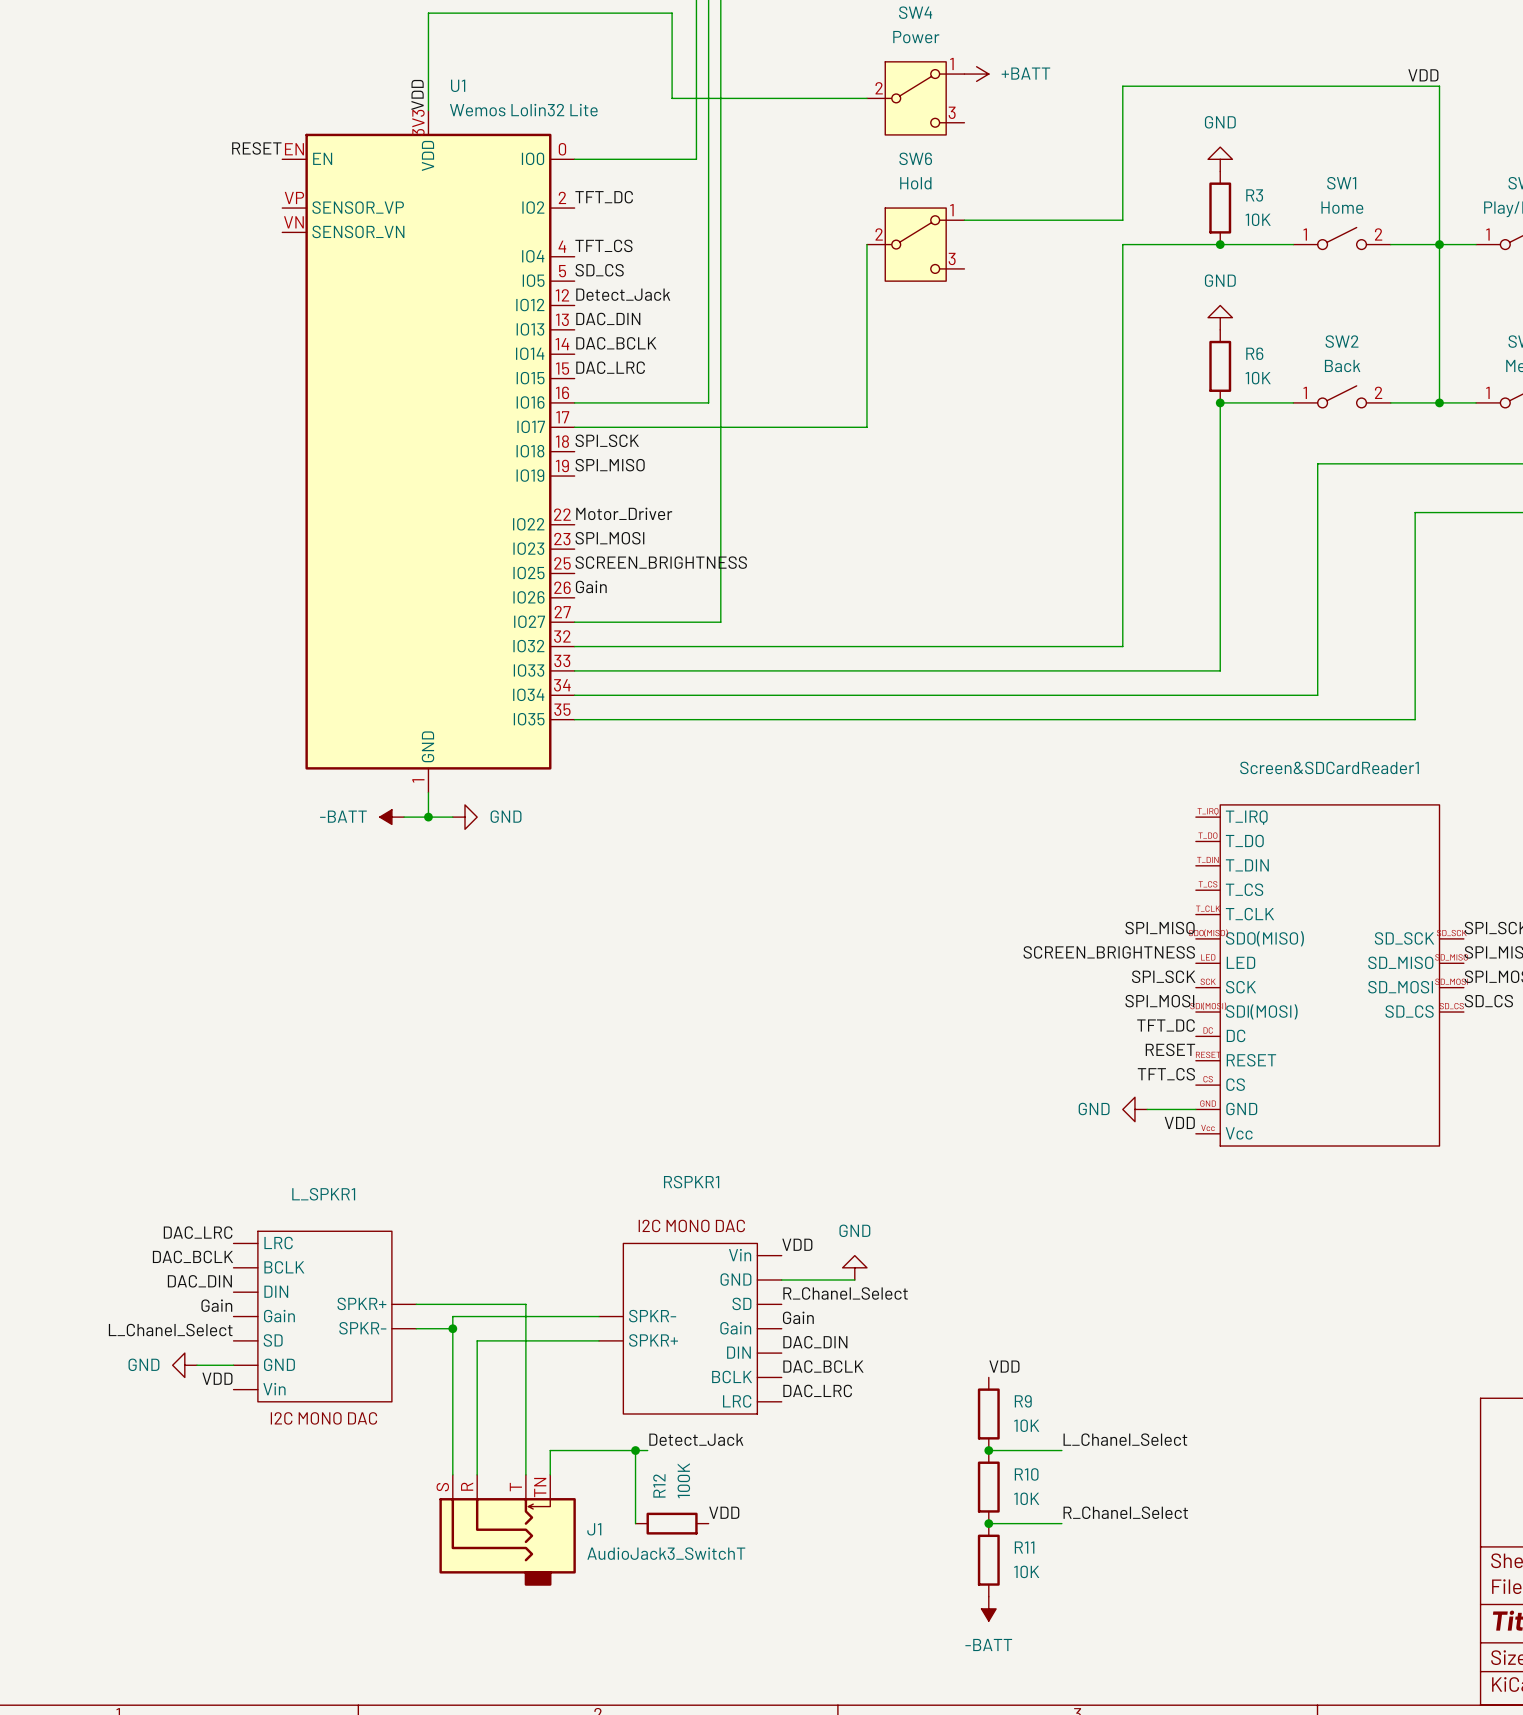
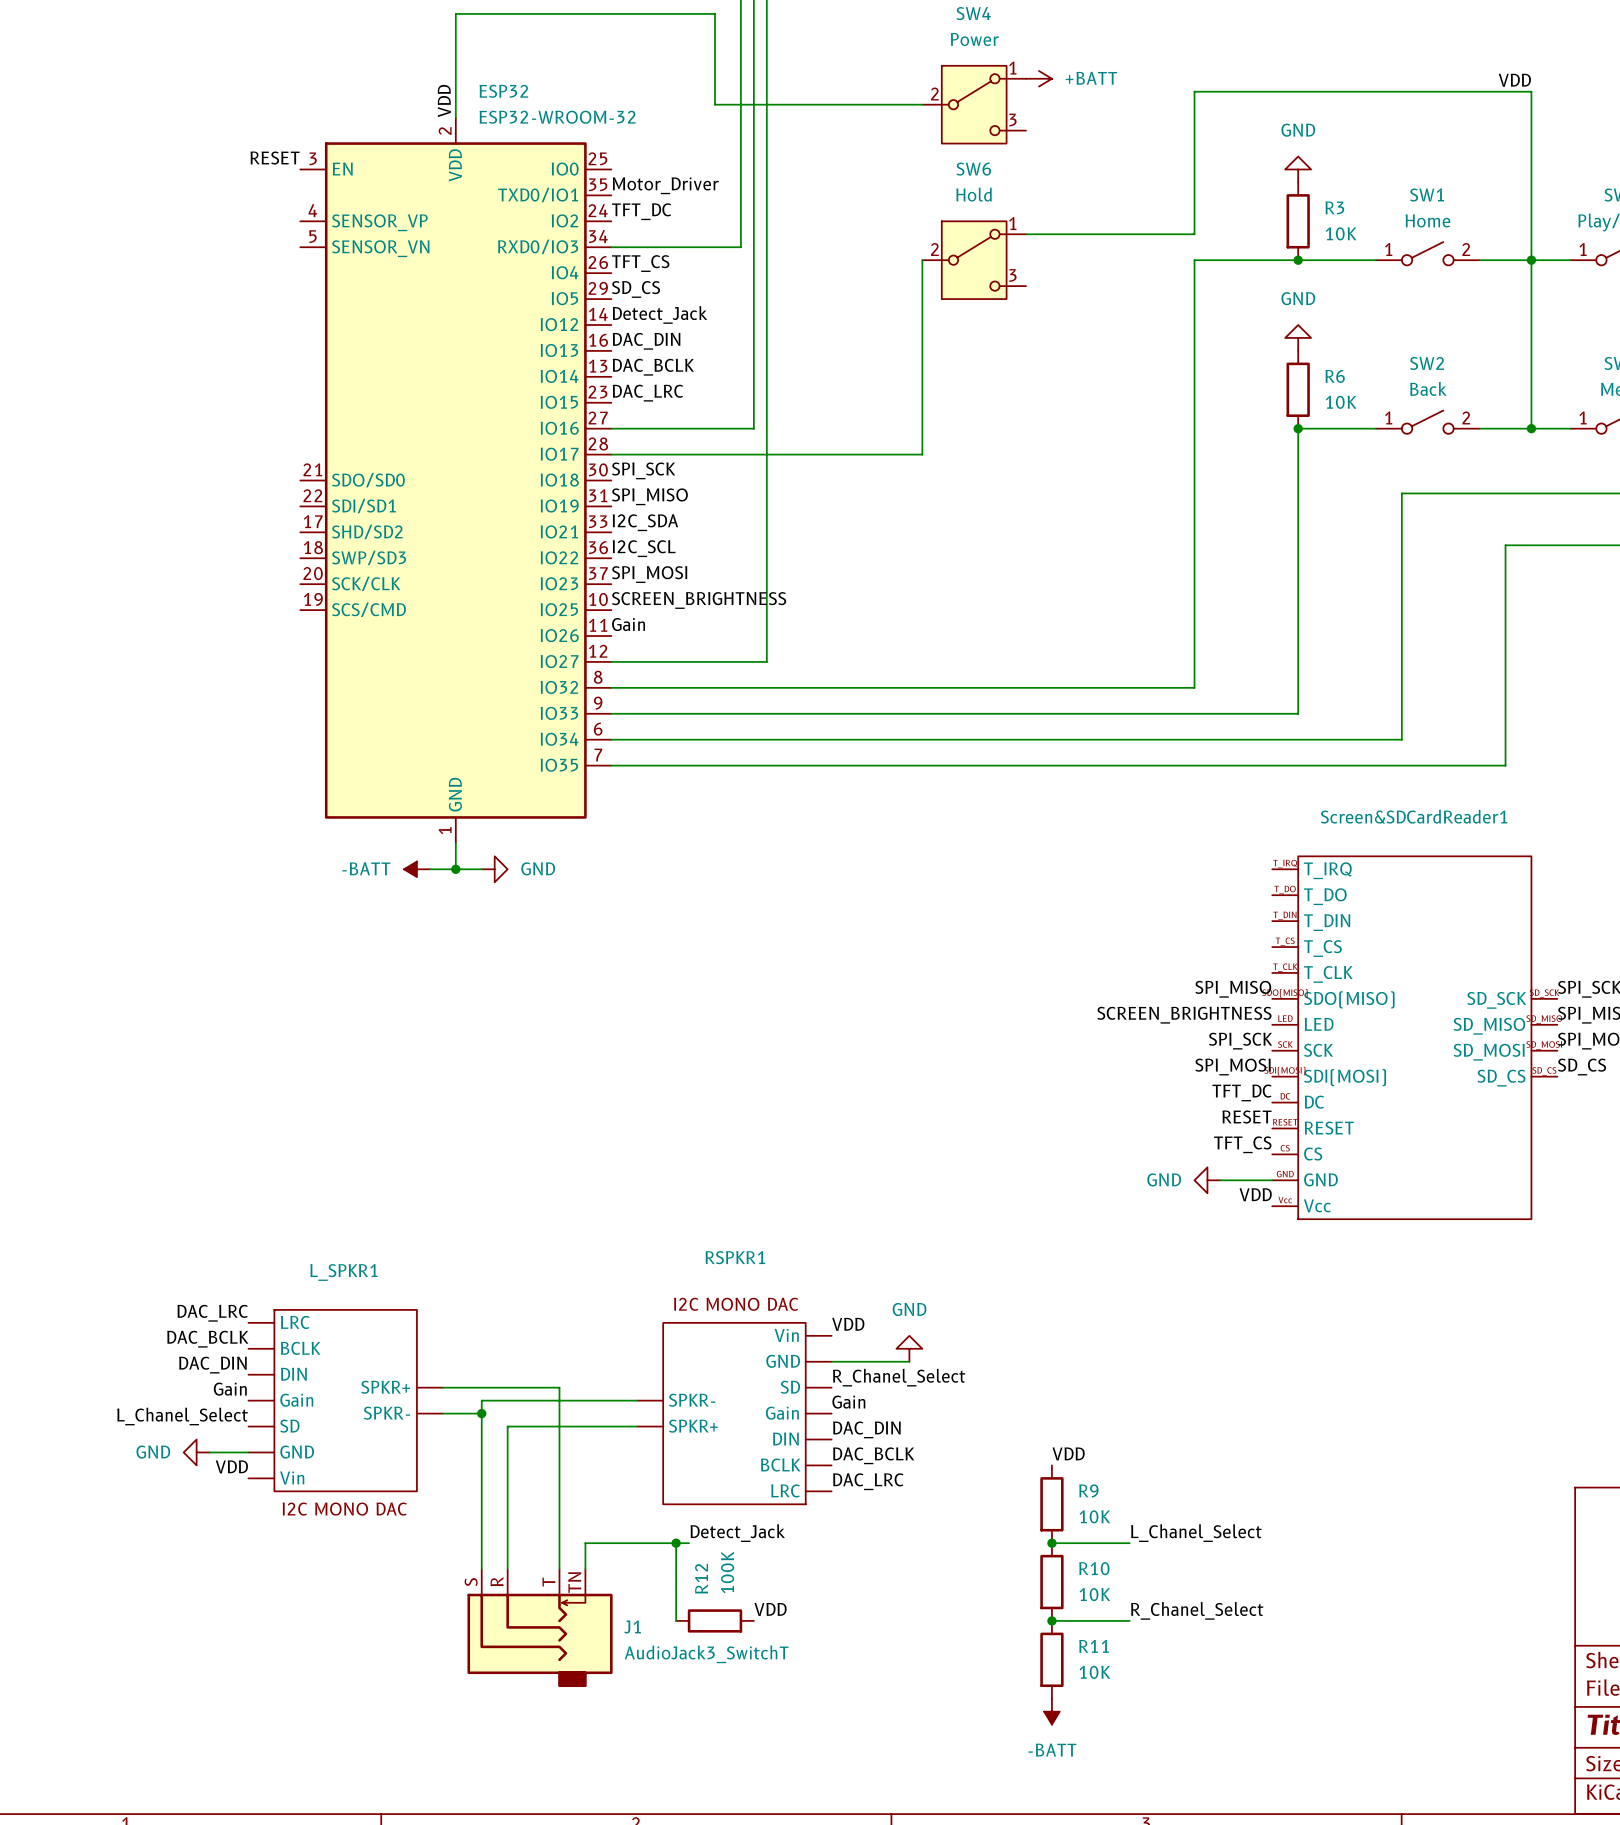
wire: (574, 159) (696, 159) -> (611, 247) (740, 247) (740, 169)
label: none -> Motor_Driver (665, 185)
U1: Wemos Lolin32 Lite (428, 451) -> none
ESP32: none -> ESP32-WROOM-32 (455, 480)
label: none -> I2C_SDA (645, 522)
label: Motor_Driver (624, 513) -> I2C_SCL (644, 548)

